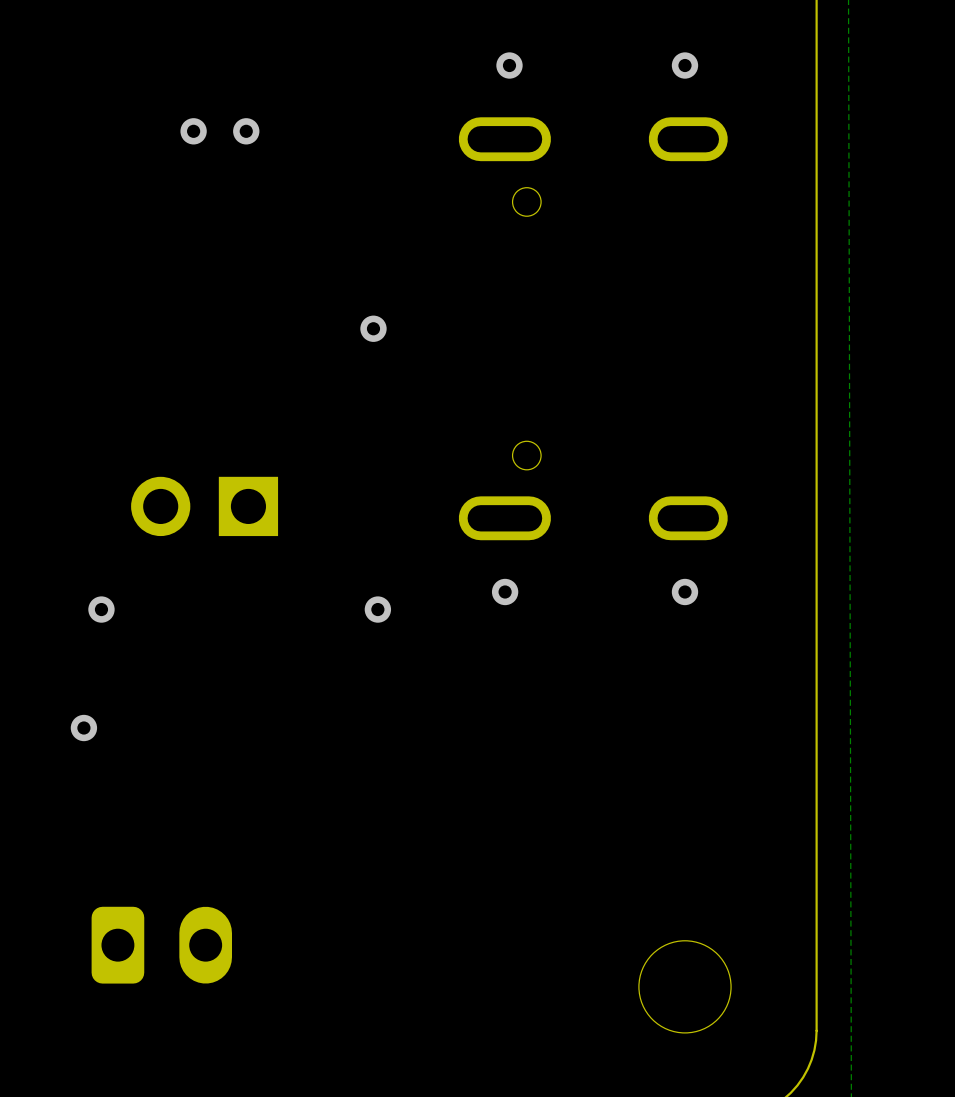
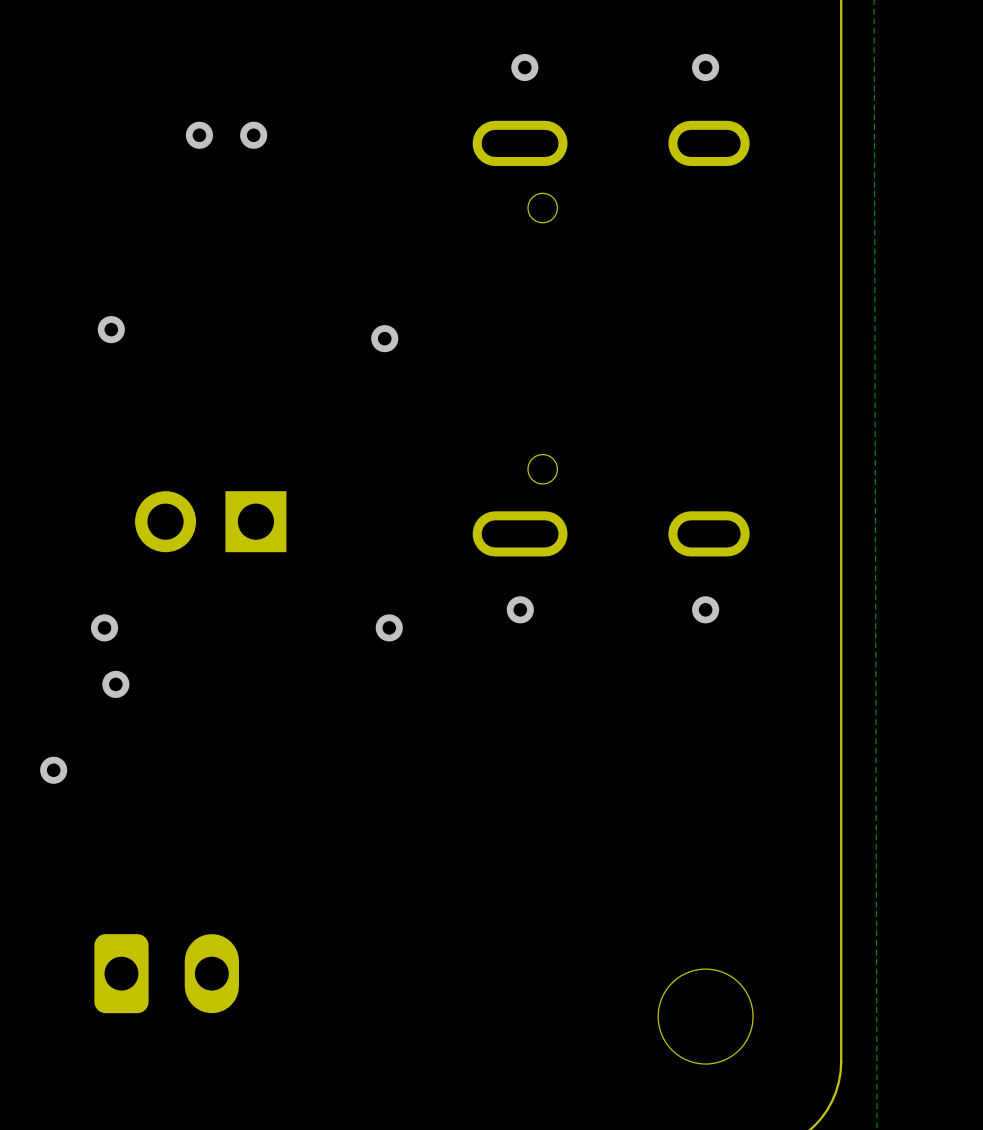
via: none -> (111, 329)
via: none -> (115, 684)
via: (83, 728) -> none
via: none -> (53, 770)

